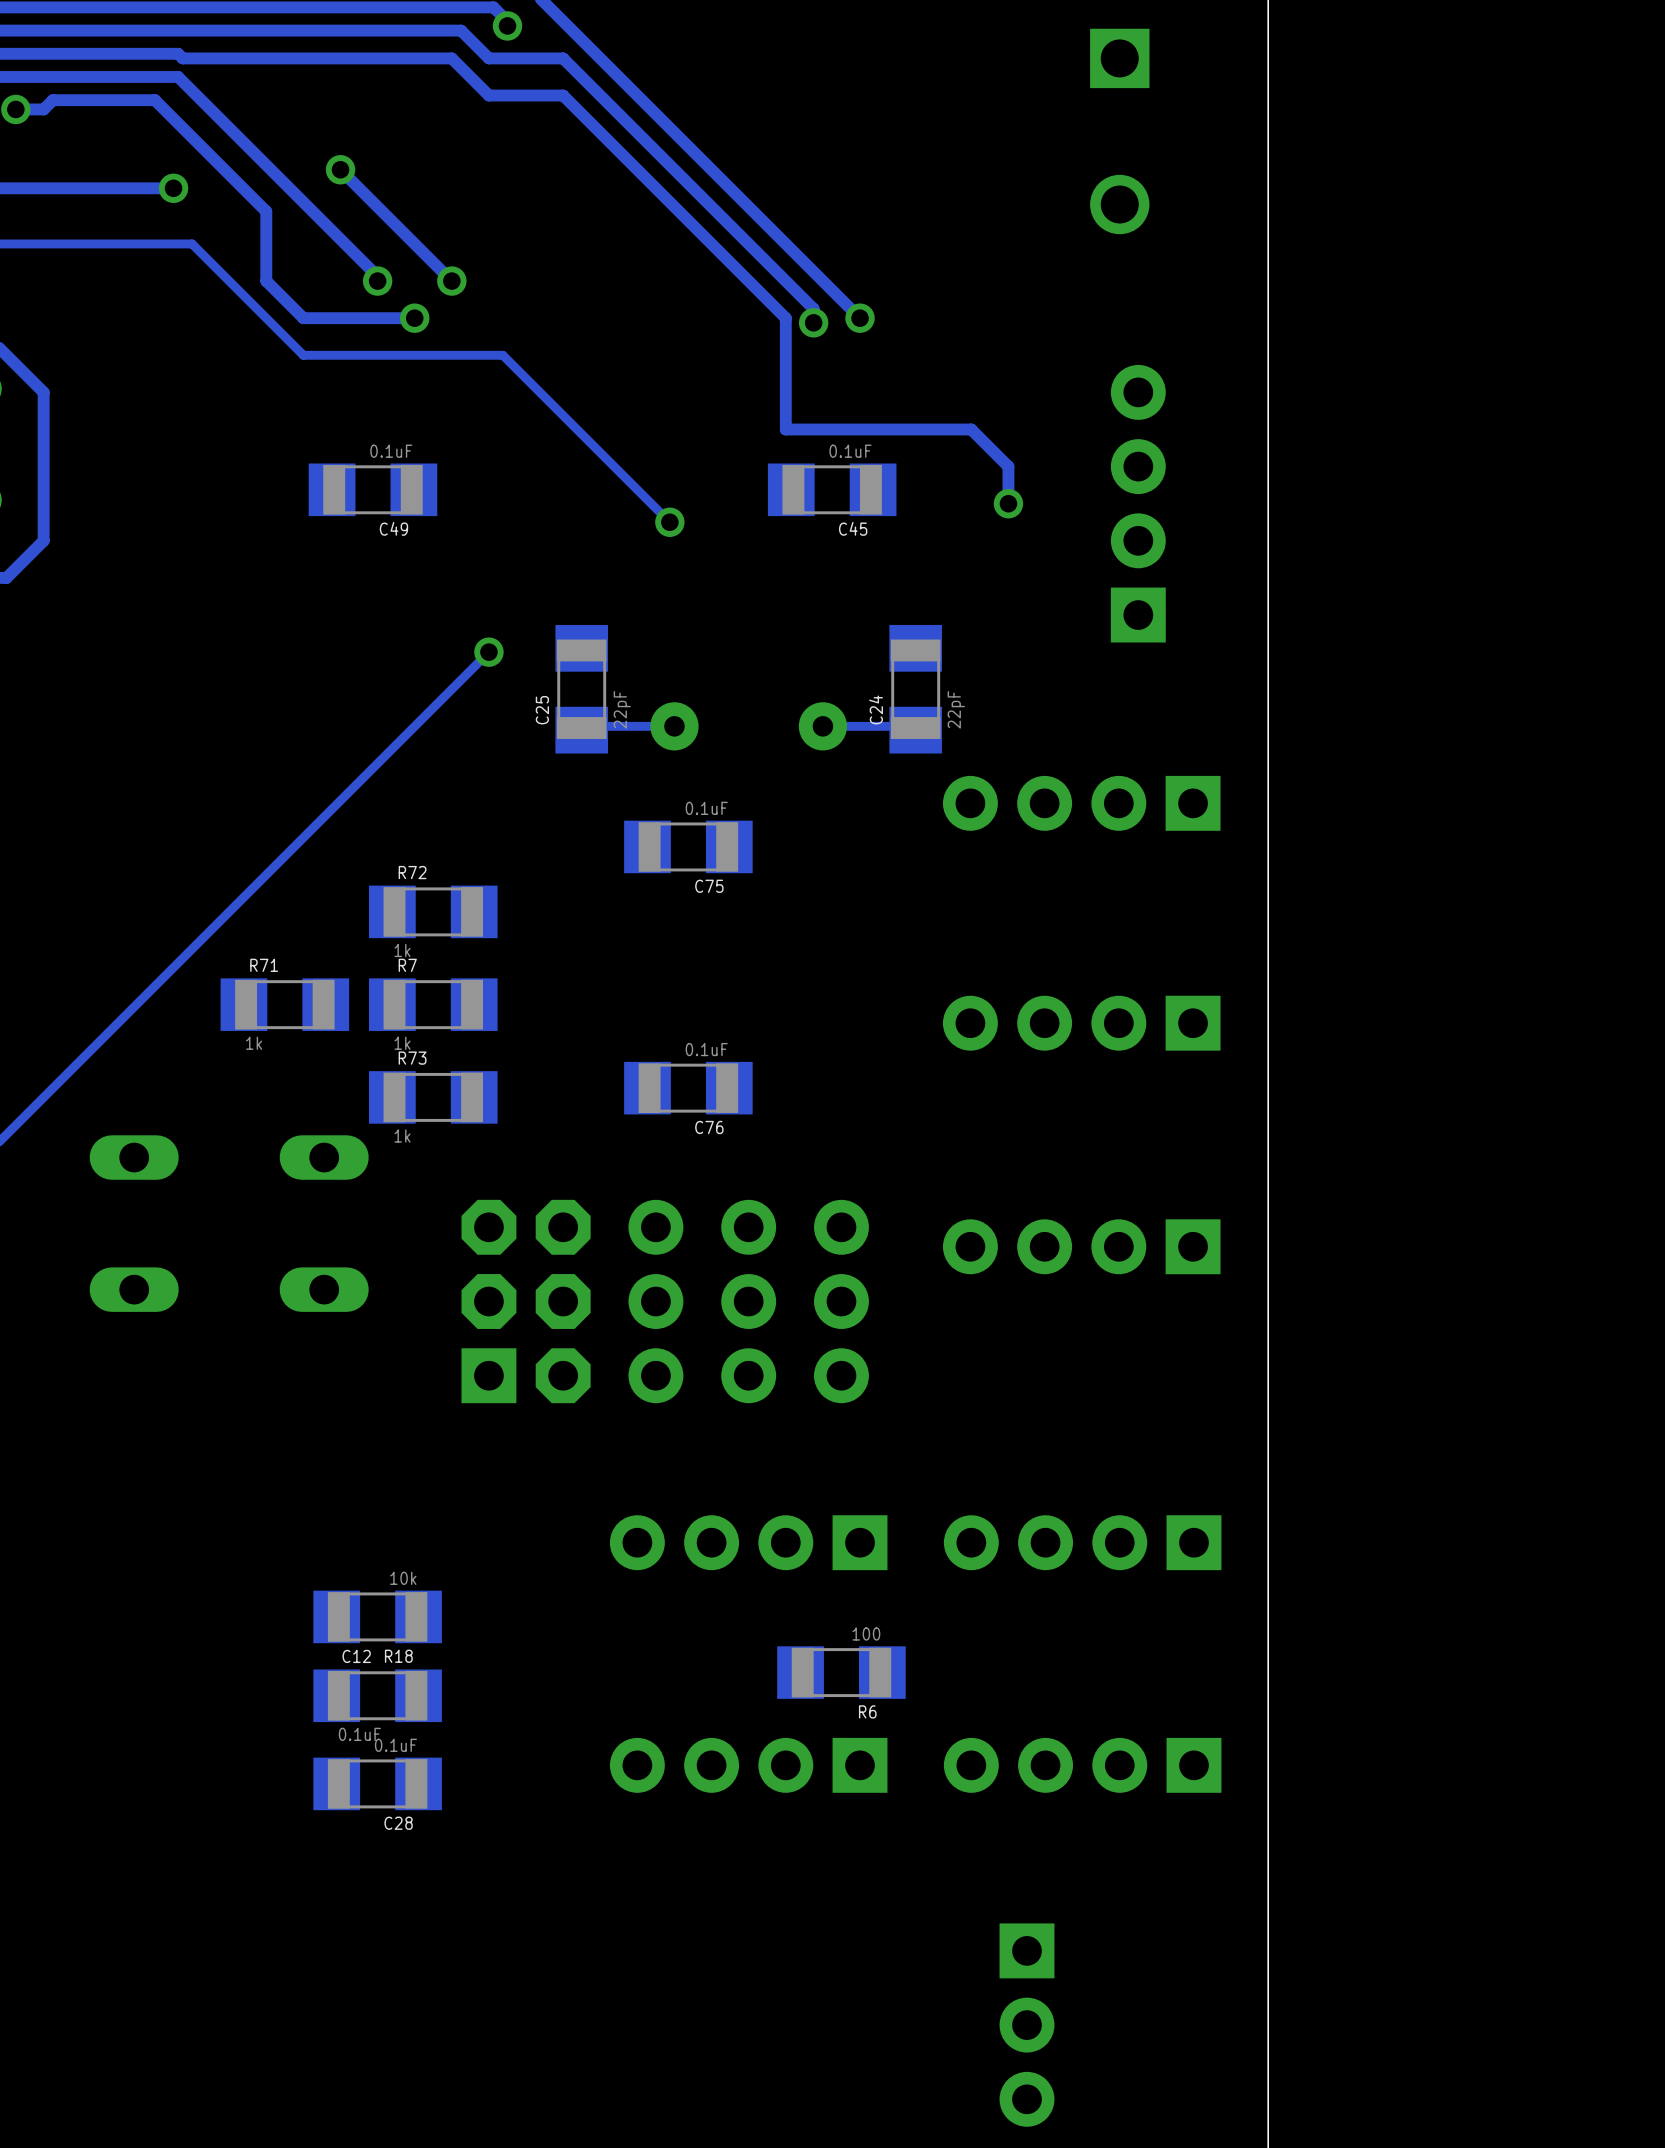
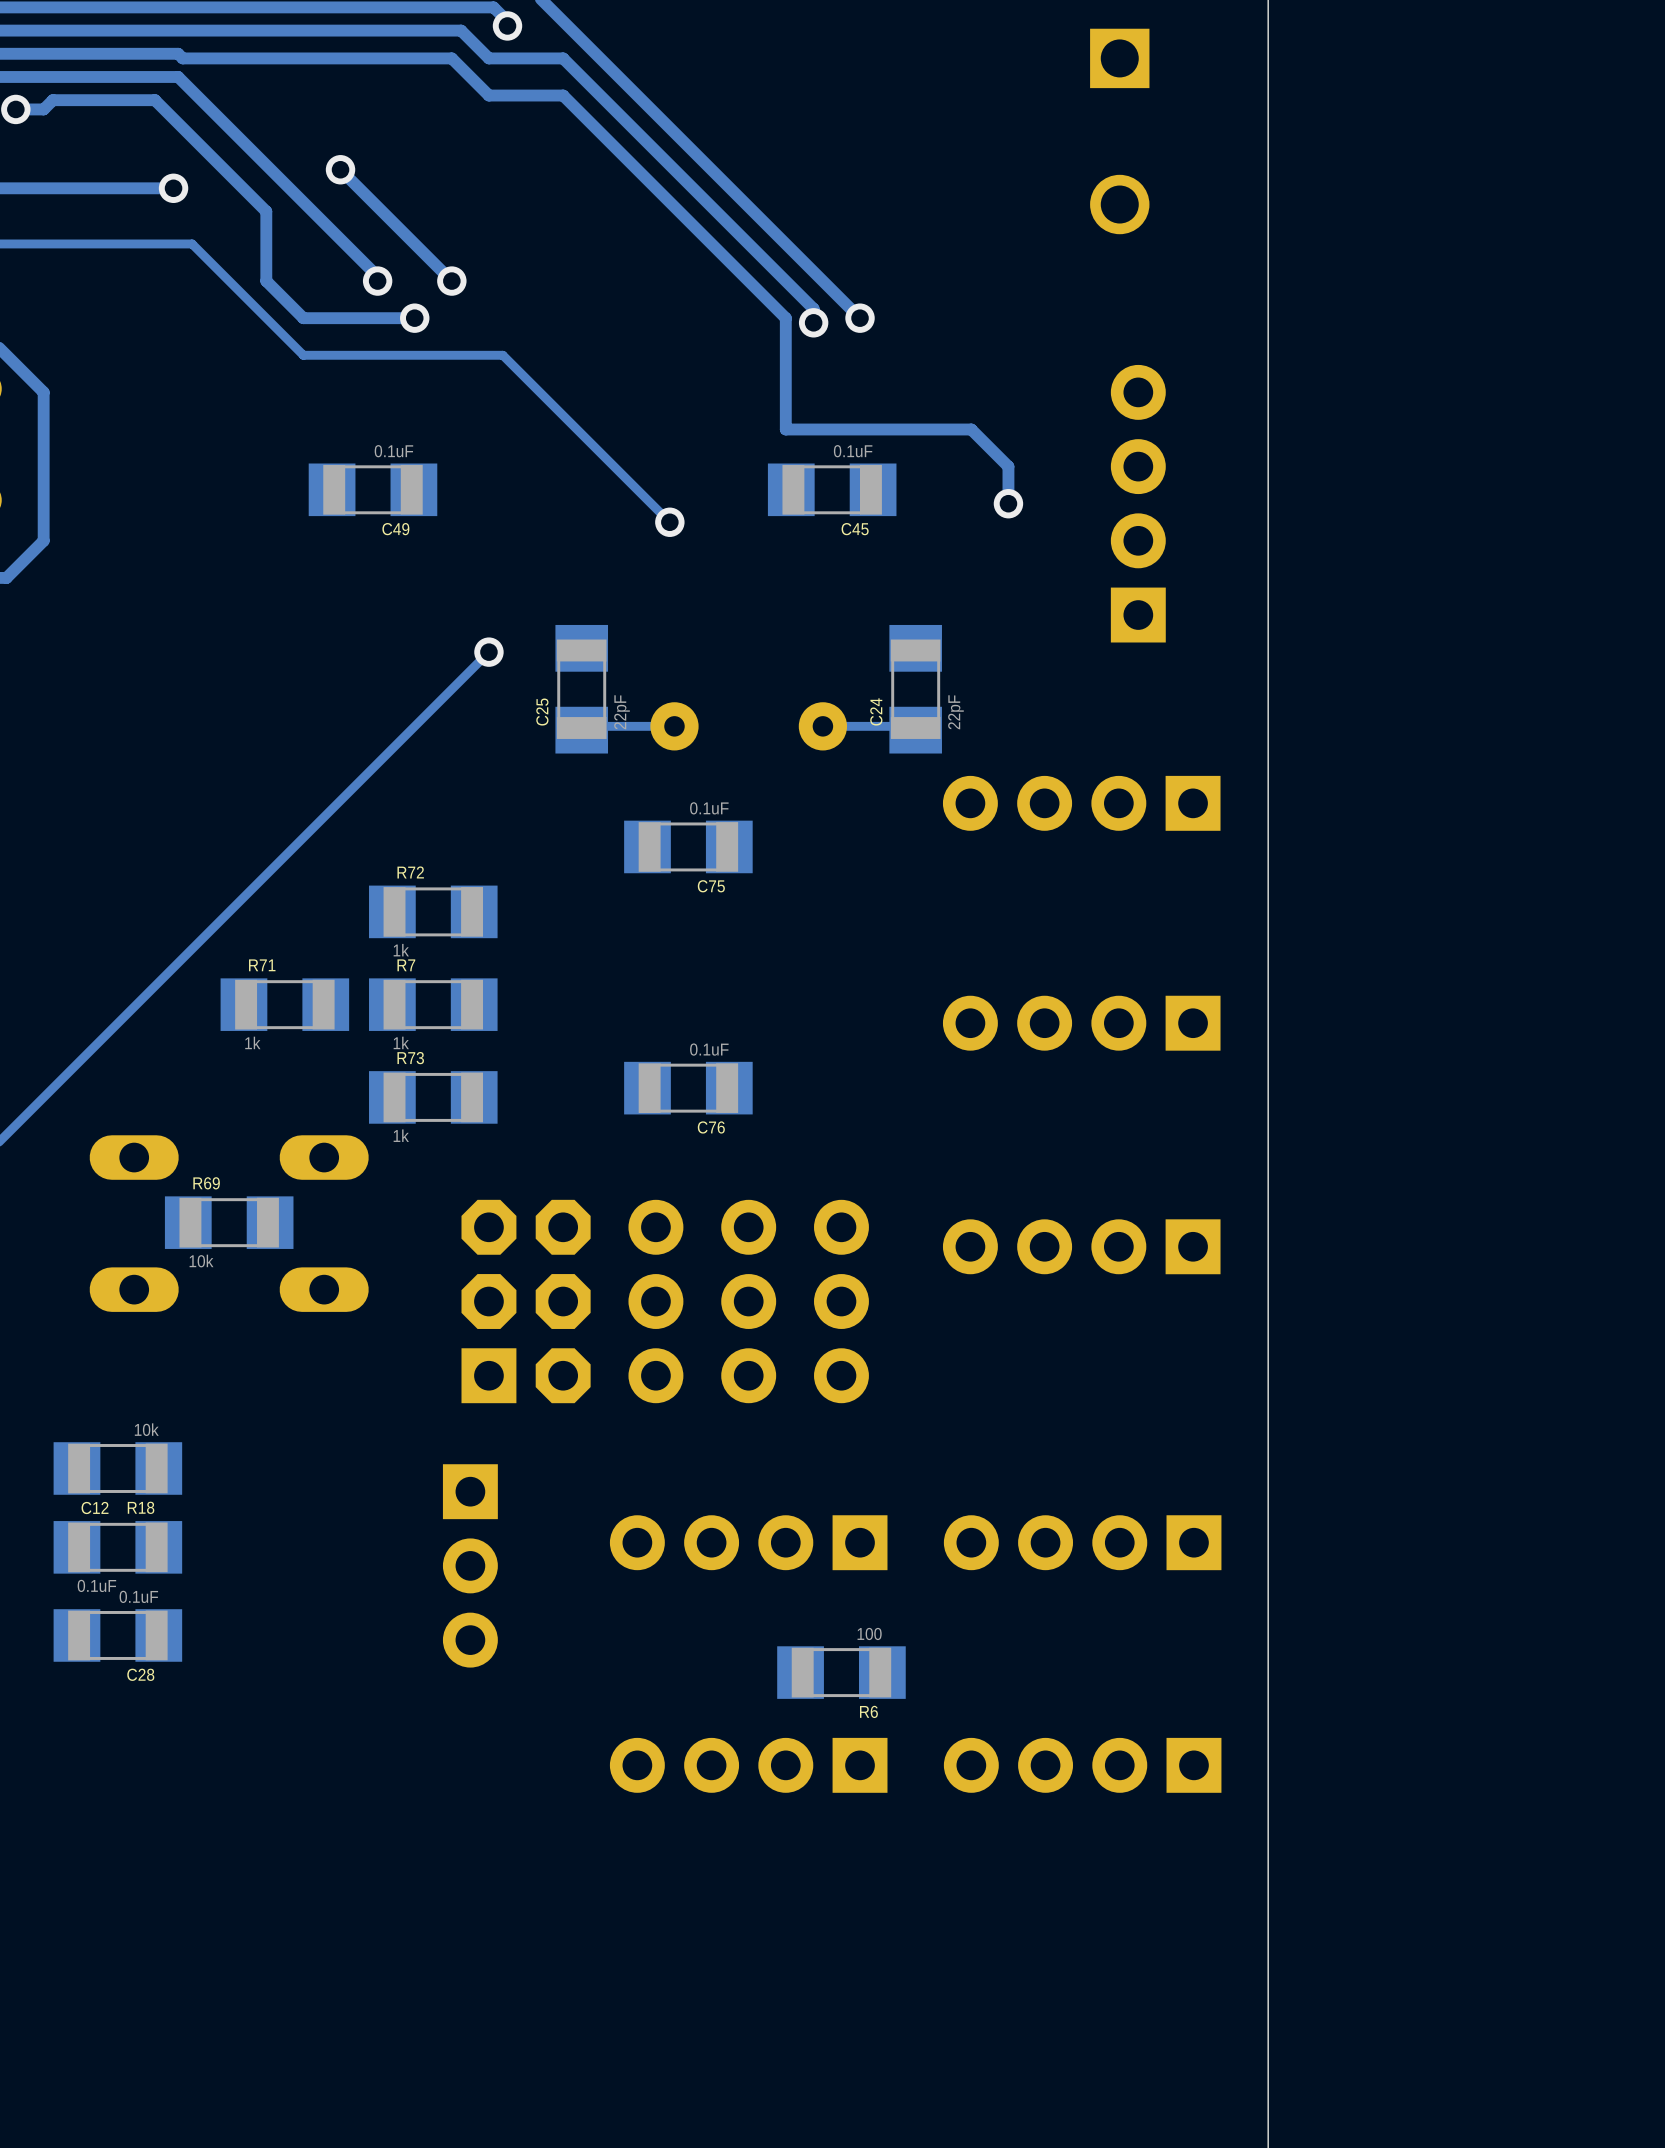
R69: none -> 10k (229, 1222)
R18 position: (377, 1616) -> (117, 1468)
C12 position: (377, 1695) -> (117, 1547)
C28 position: (377, 1783) -> (117, 1635)
part position: (1027, 2025) -> (470, 1565)

